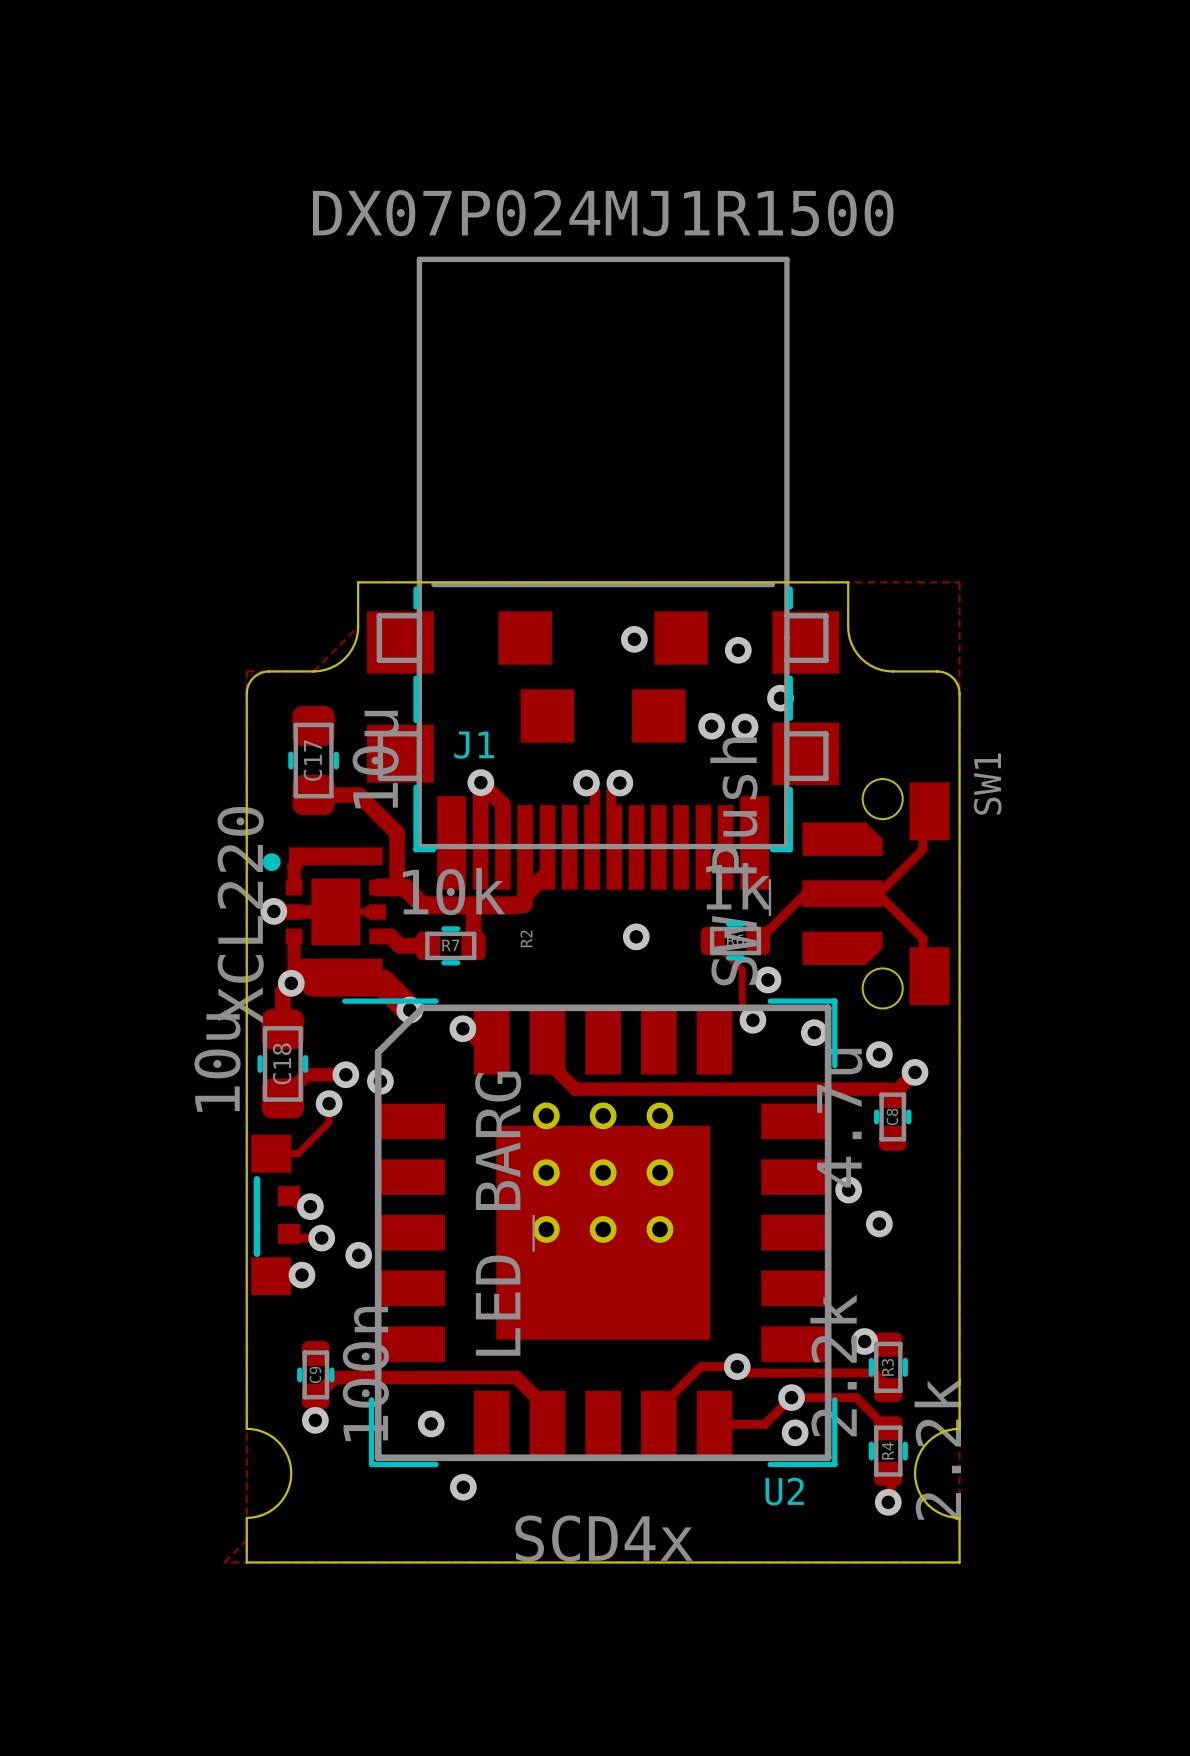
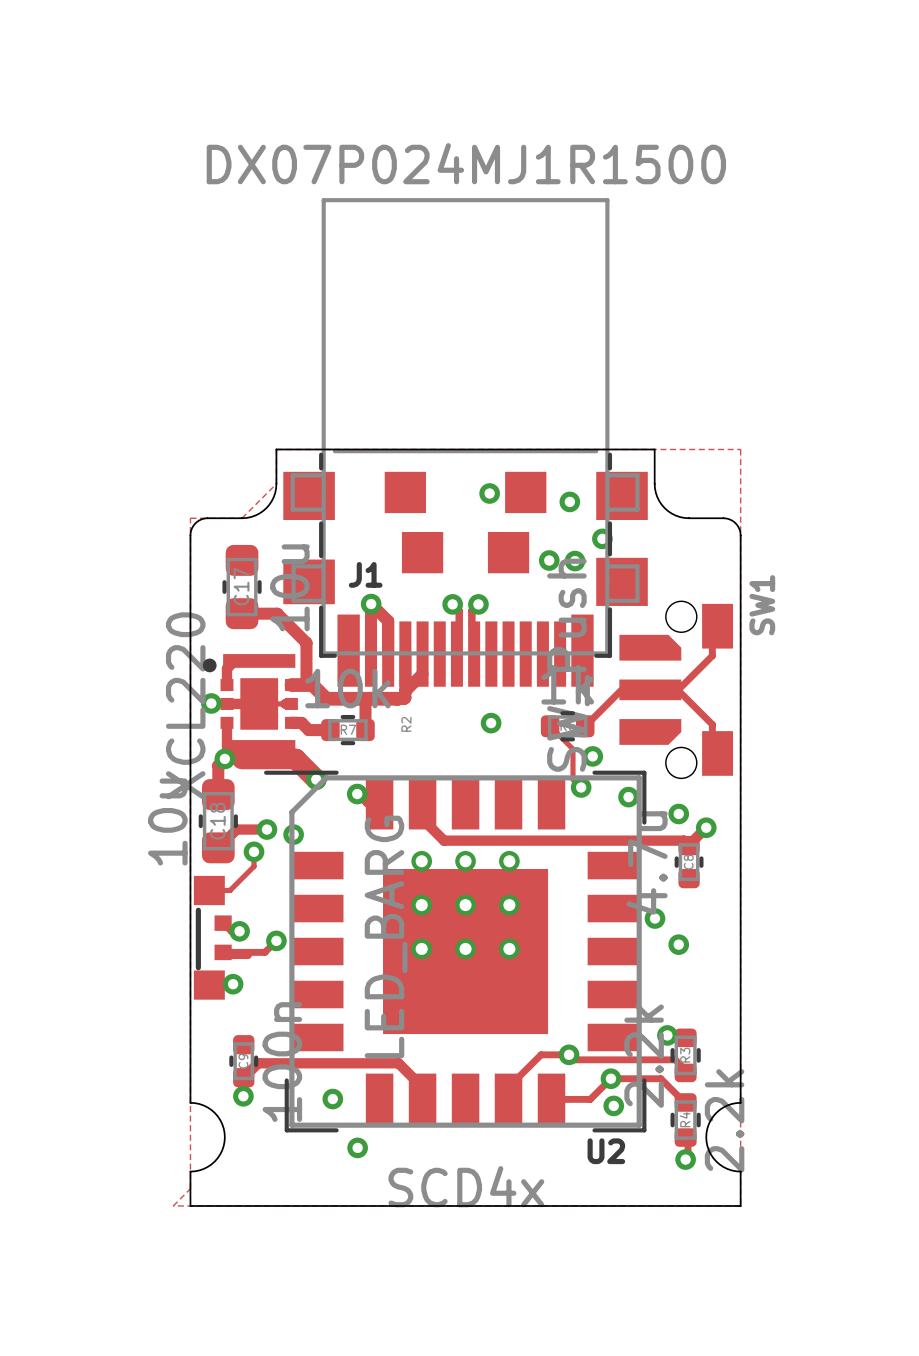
track: none -> (276, 940) (264, 952) (223, 952)
via: none -> (276, 940)
via: (321, 1238) -> none
via: (358, 1255) -> none

